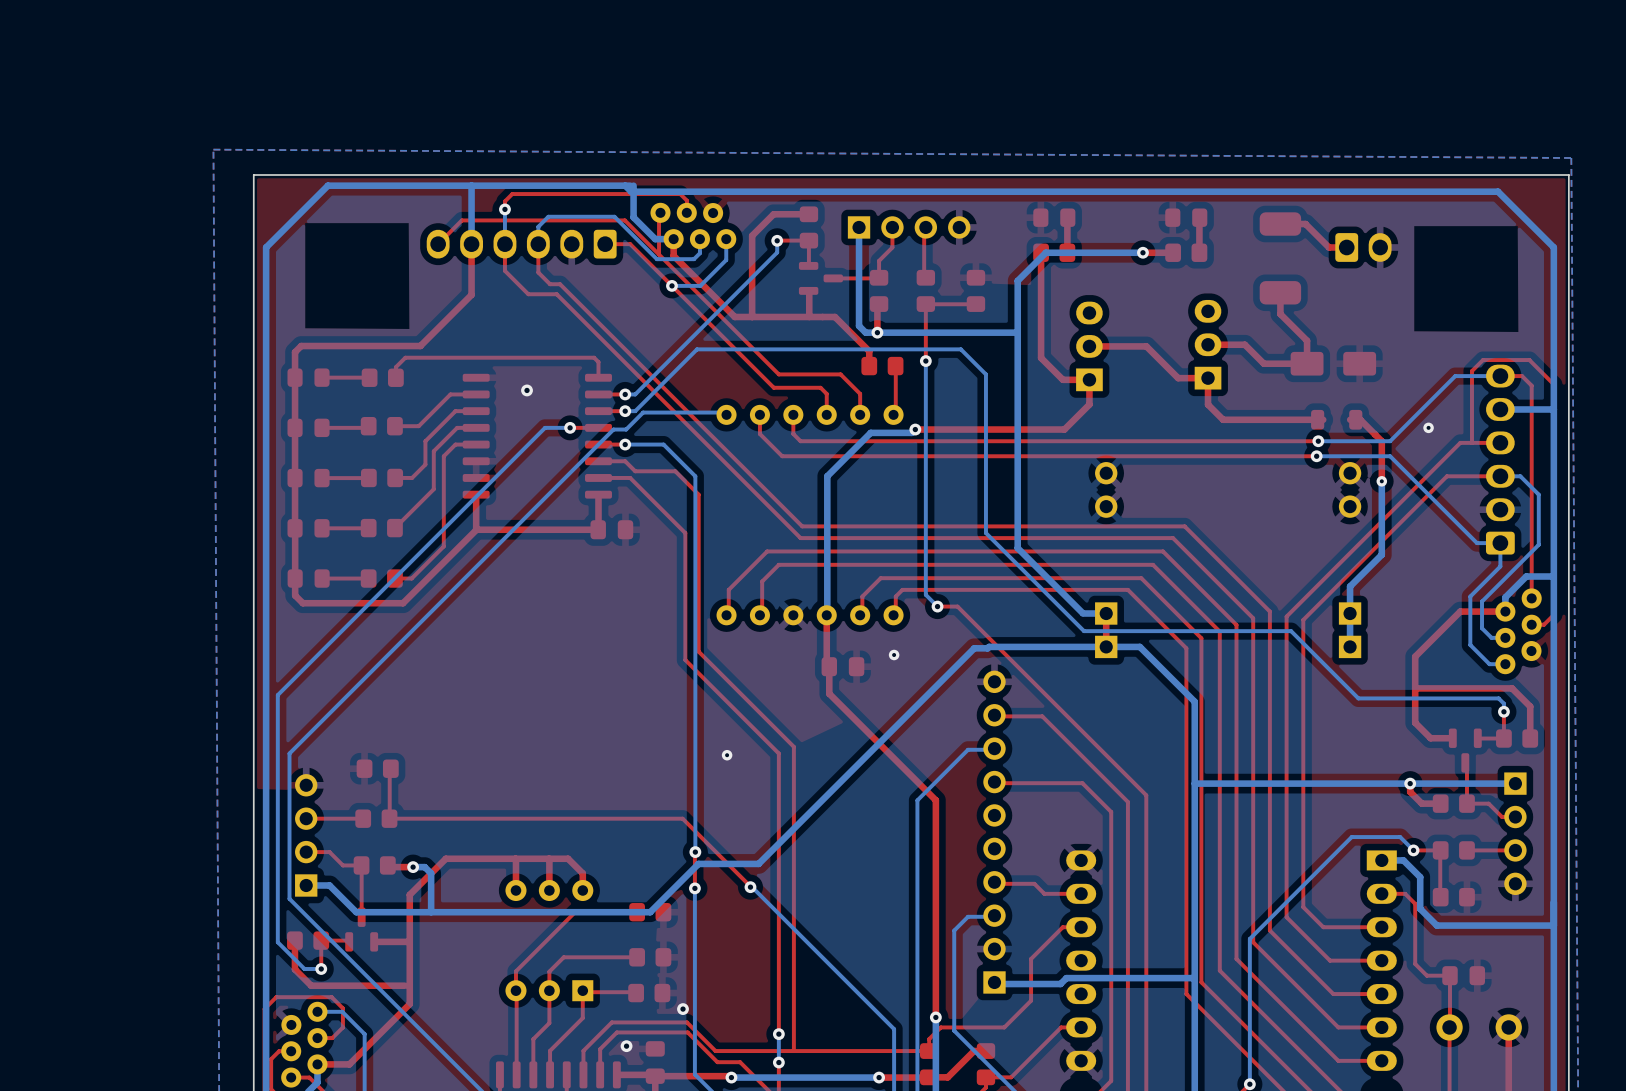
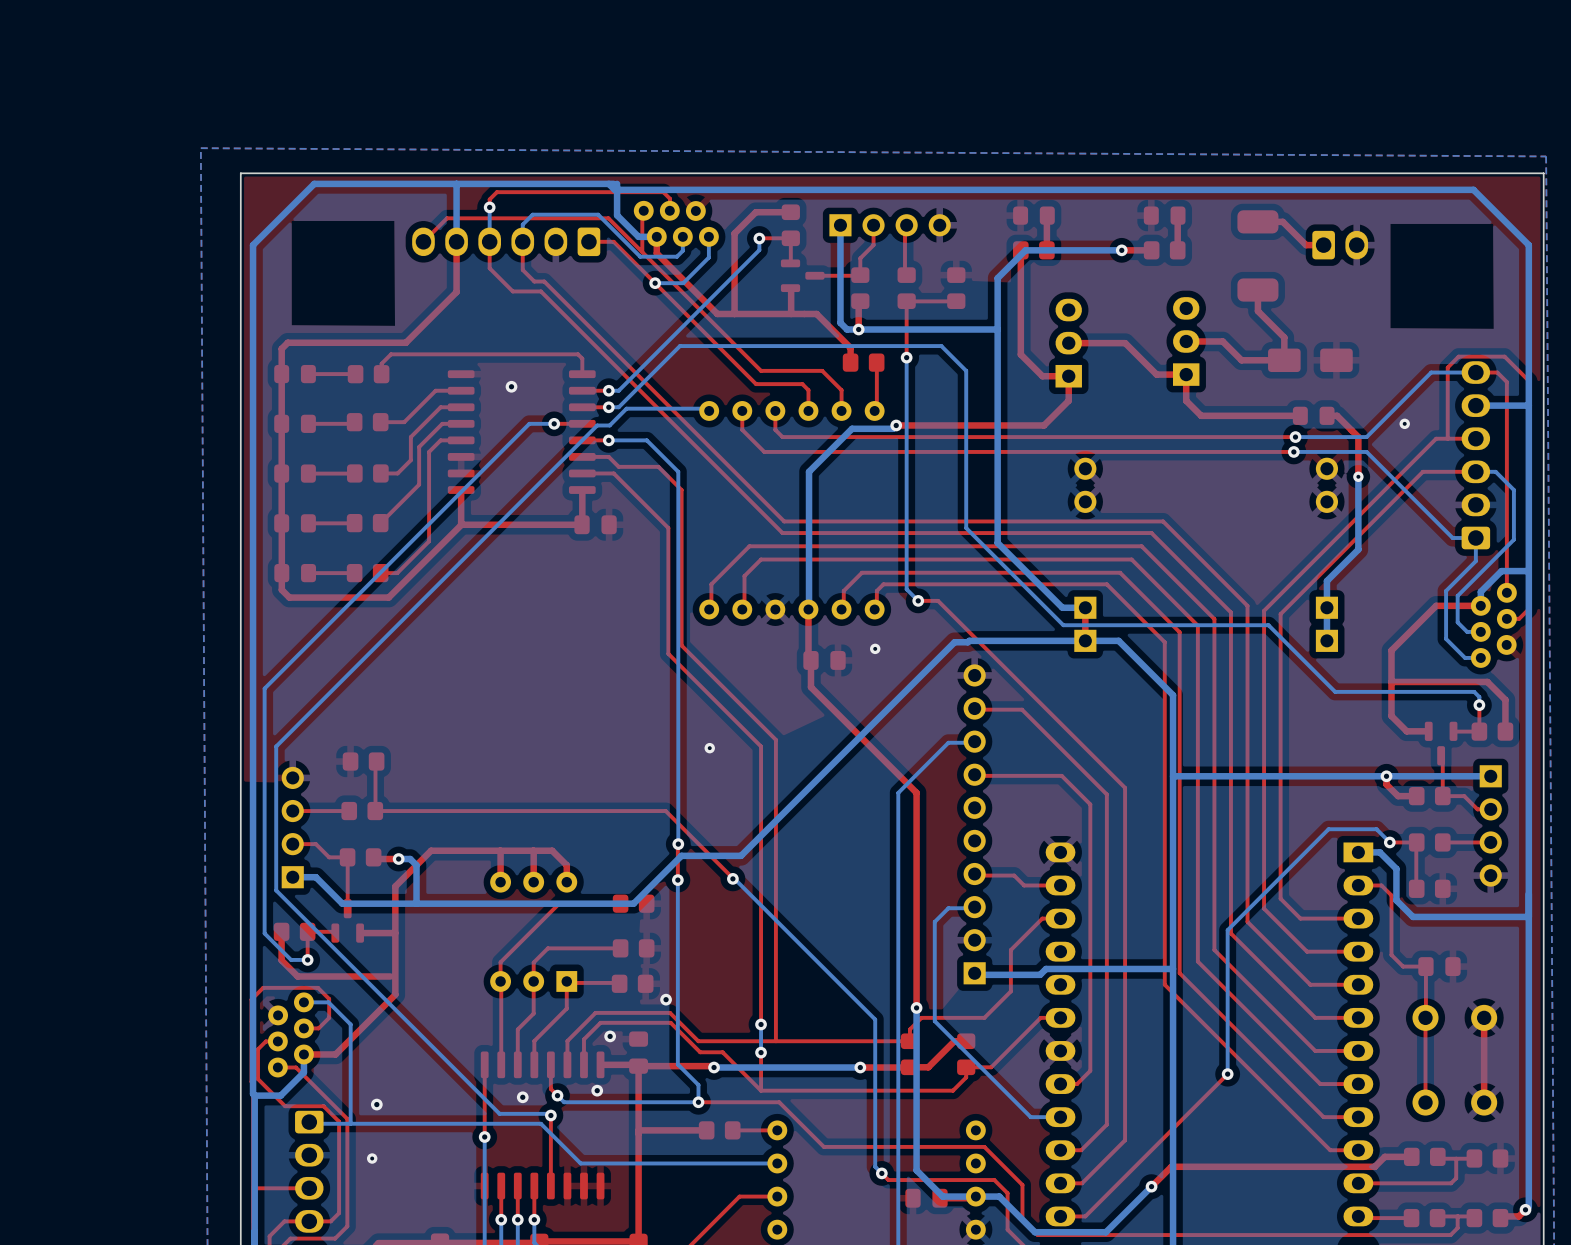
part footprint: [1311, 409, 1363, 430] -> [1292, 406, 1335, 425]

